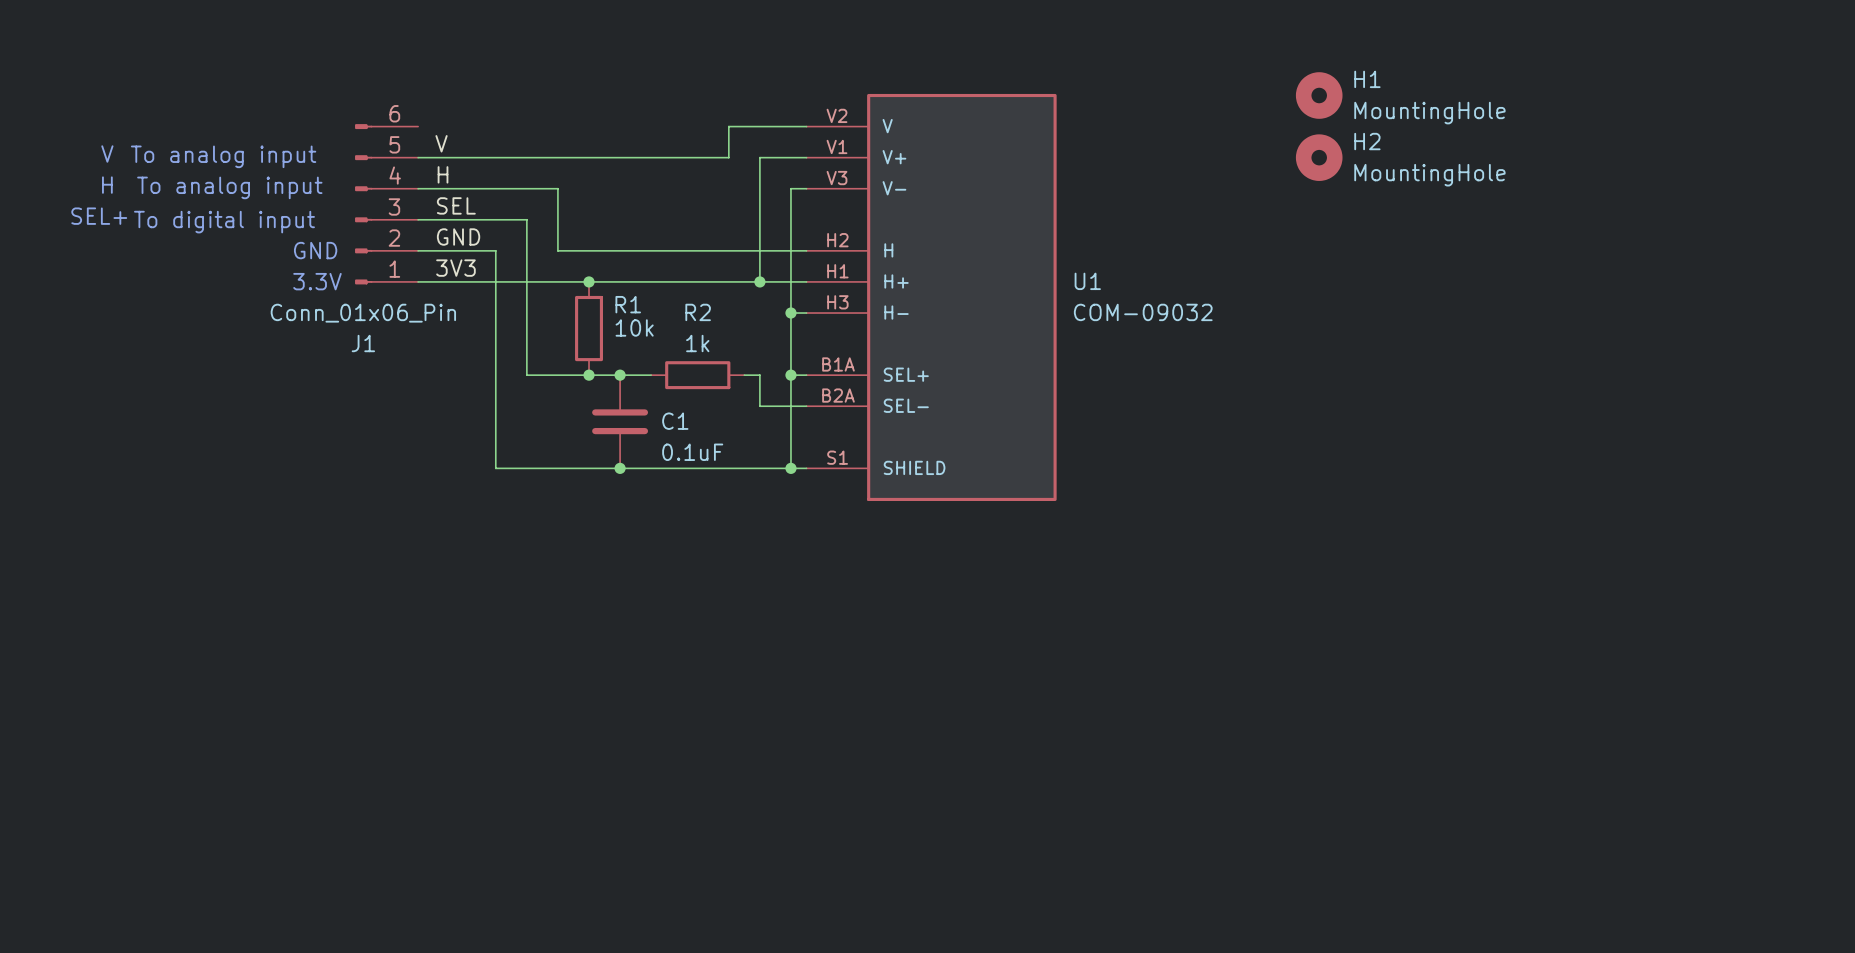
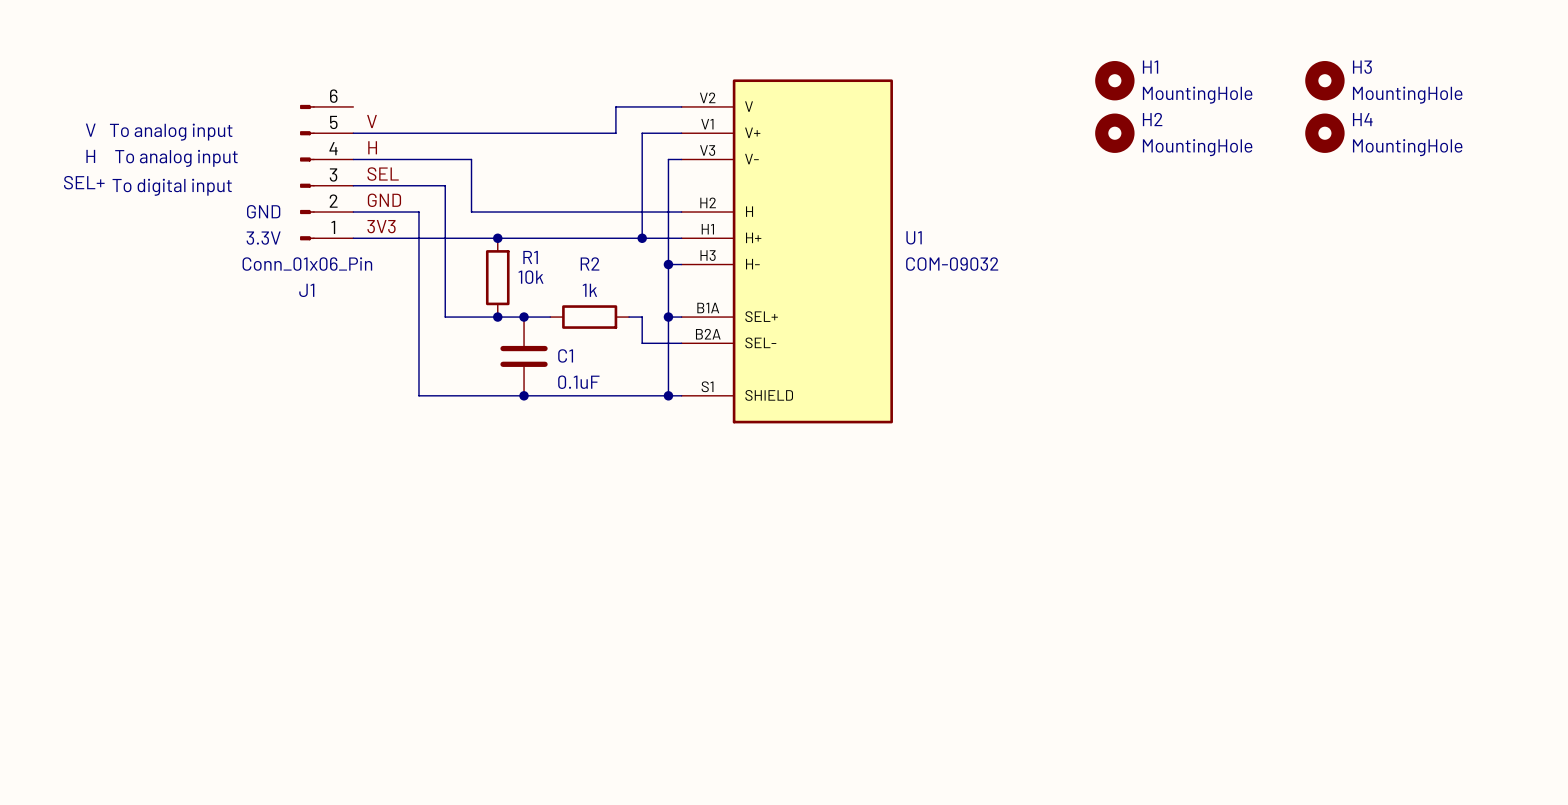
H3: none -> MountingHole (1324, 80)
H4: none -> MountingHole (1324, 133)

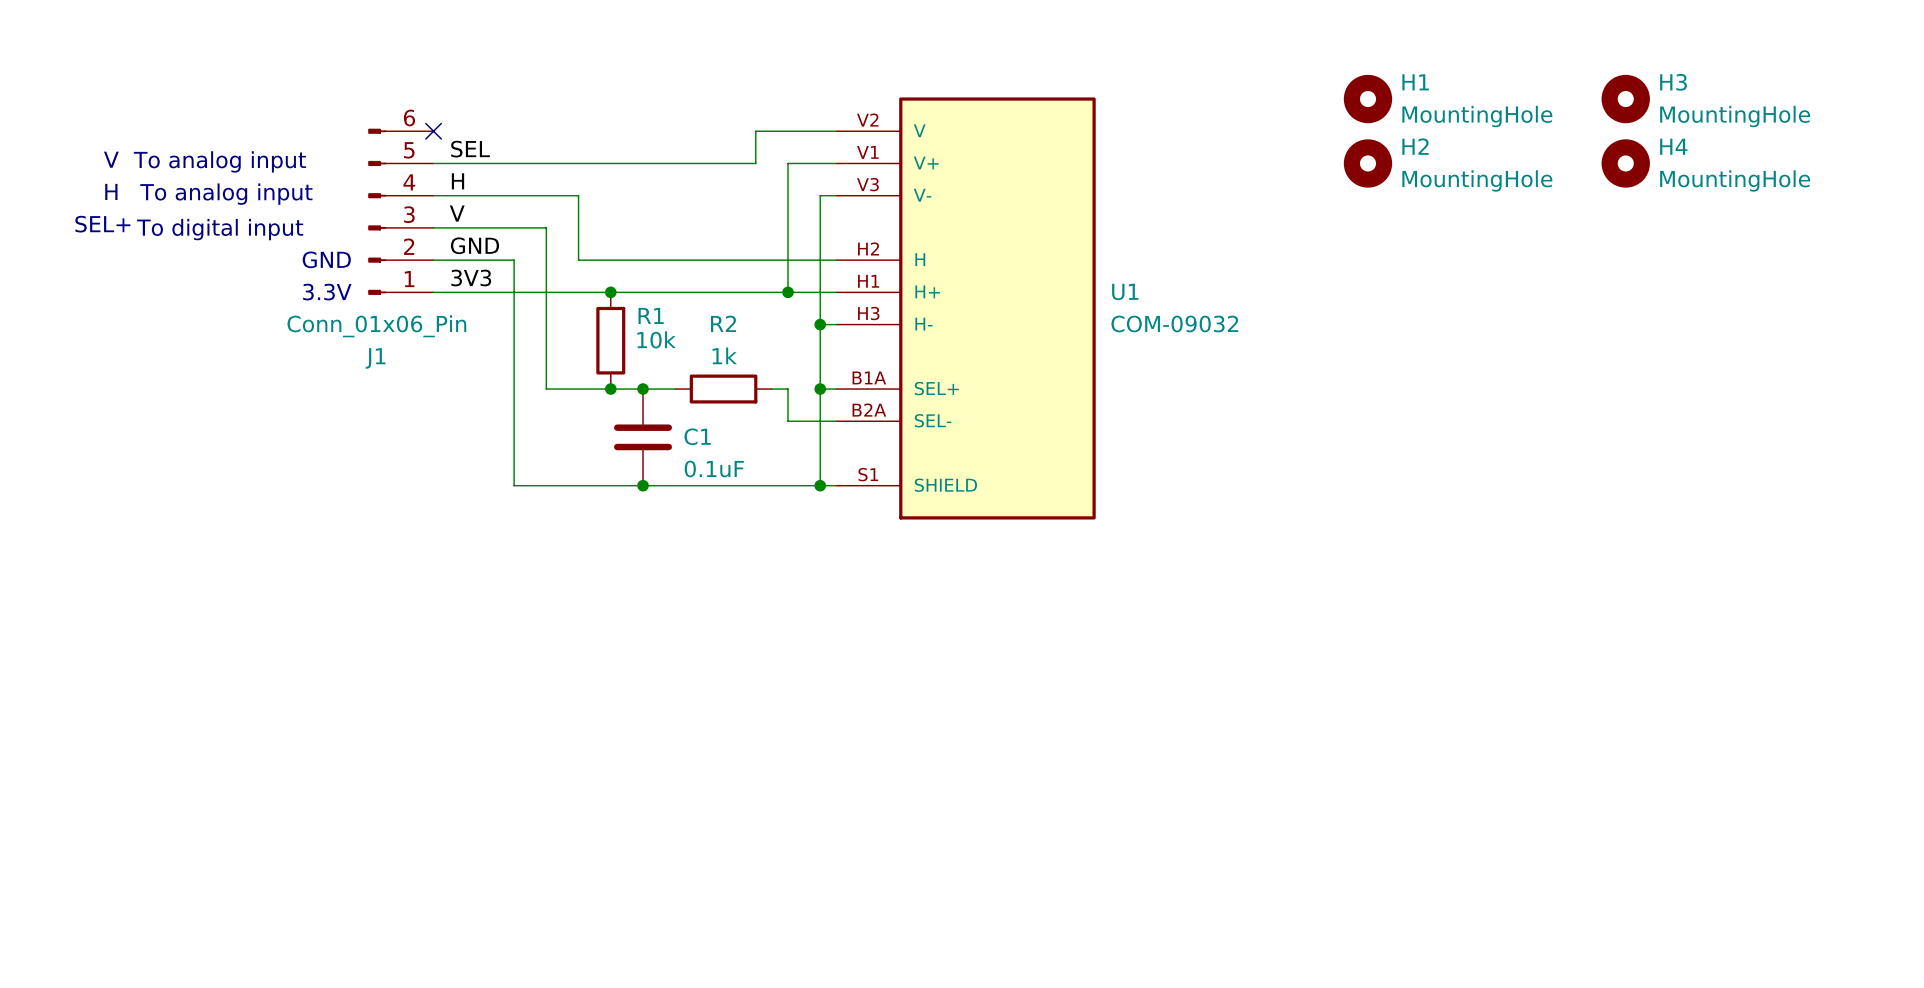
no-connect mark: none -> (433, 131)
label: V (372, 121) -> SEL (470, 149)
label: SEL (383, 174) -> V (457, 213)

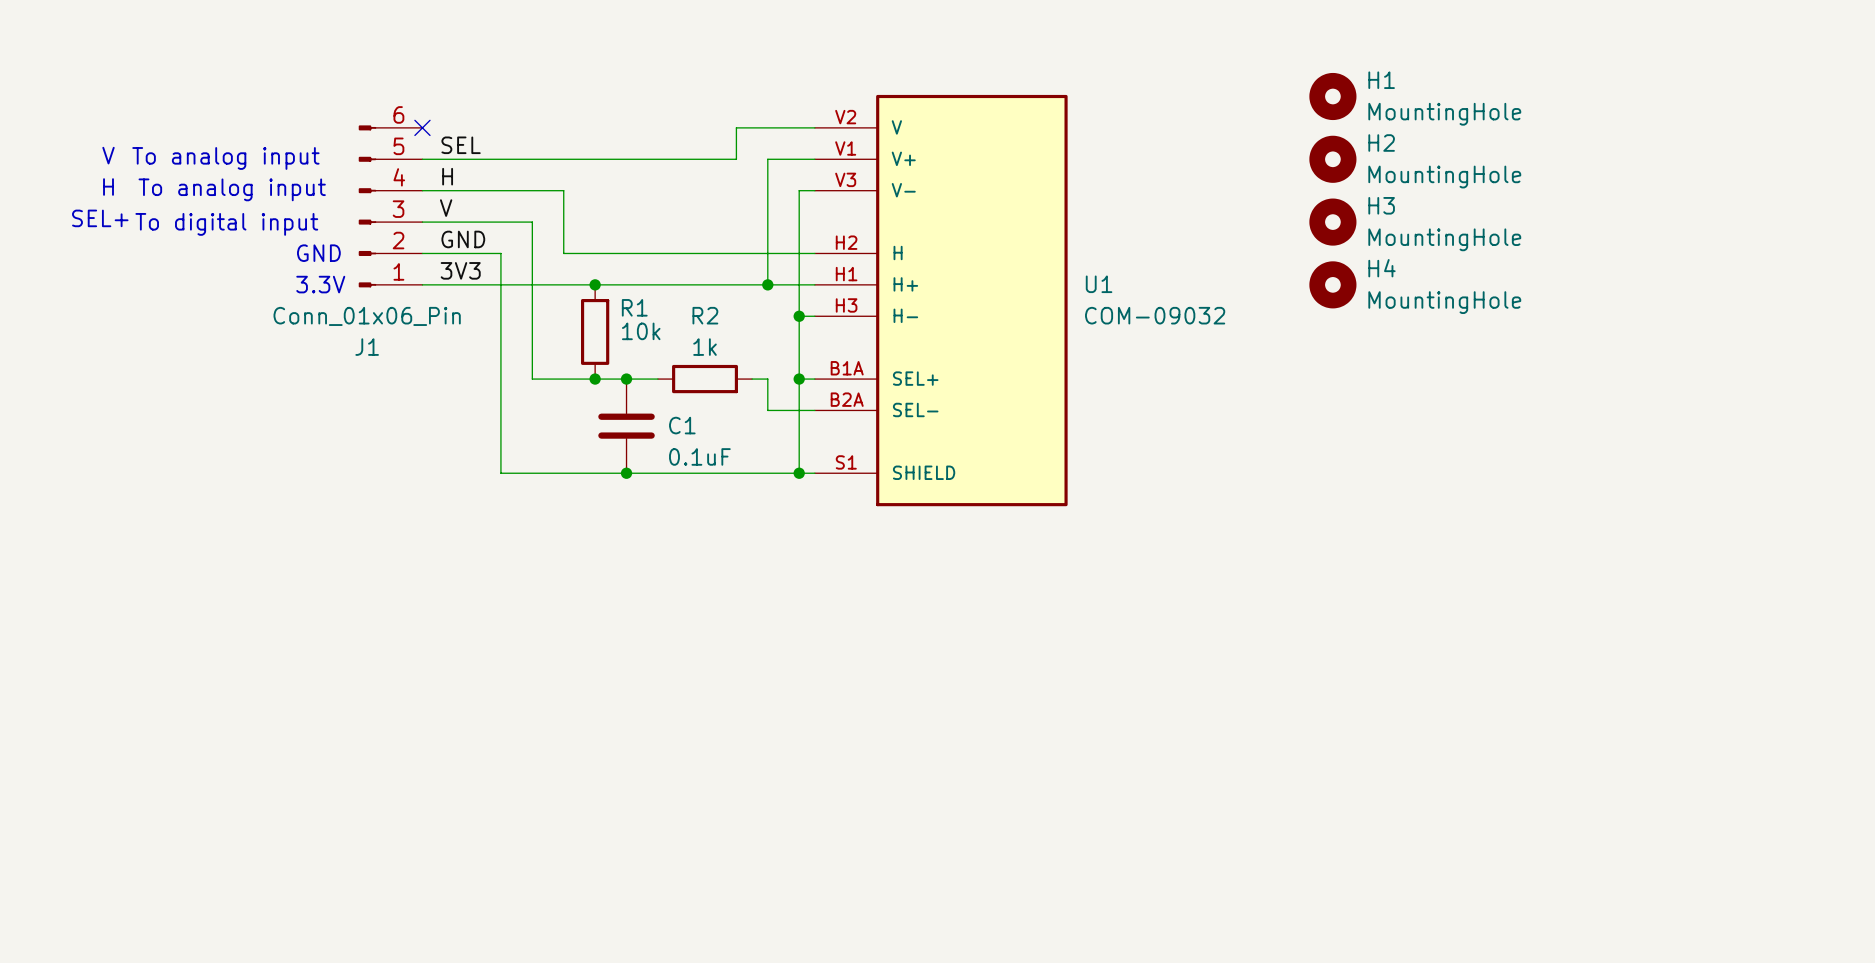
H3 position: (1625, 99) -> (1332, 222)
H4 position: (1625, 163) -> (1332, 284)

